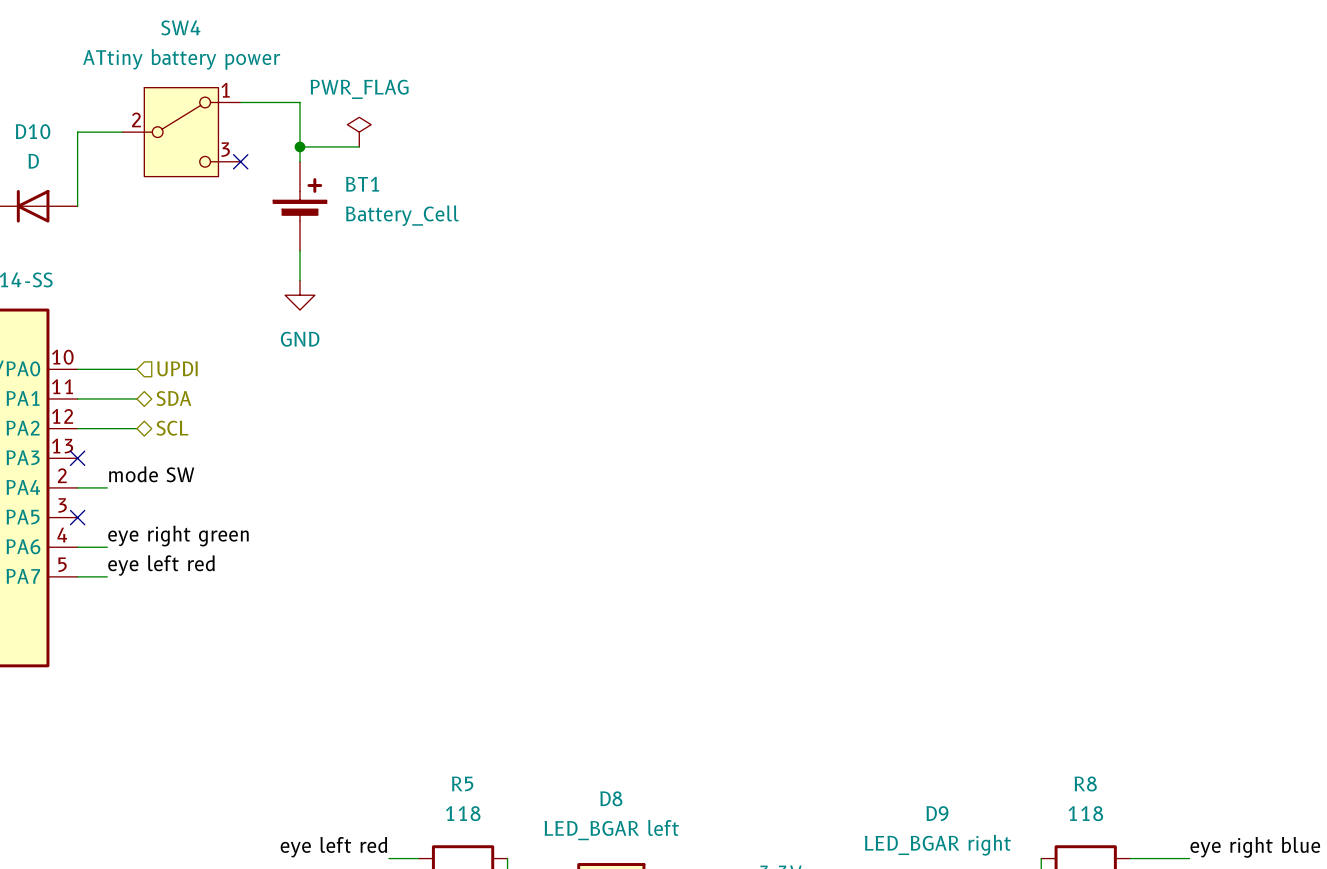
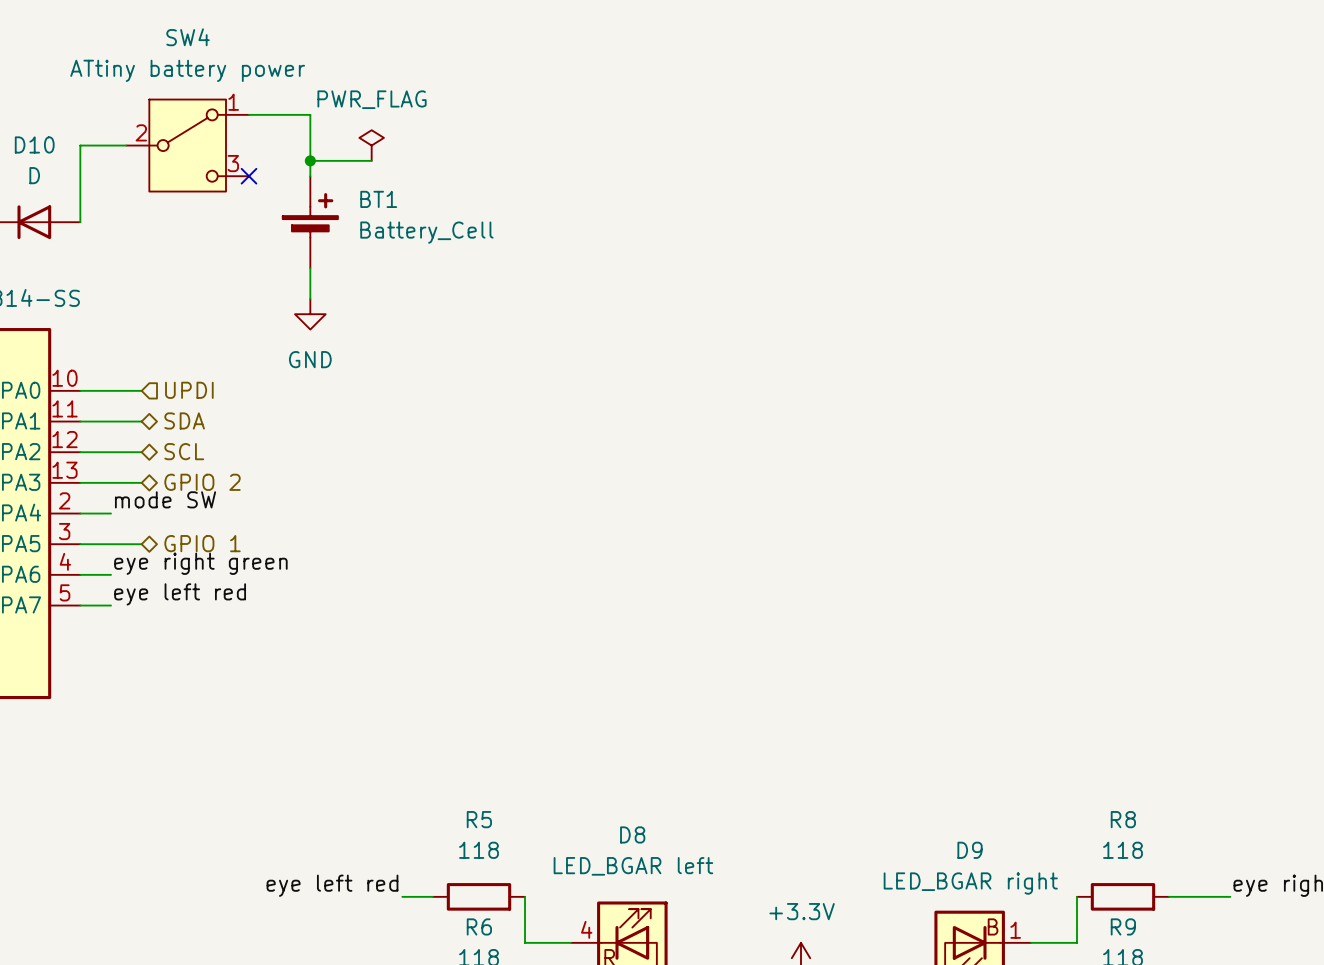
hierarchical label: none -> GPIO 2 (202, 482)
wire: none -> (80, 482) (141, 482)
no-connect mark: (77, 458) -> none
wire: none -> (80, 544) (141, 544)
no-connect mark: (77, 517) -> none
hierarchical label: none -> GPIO 1 (202, 543)

